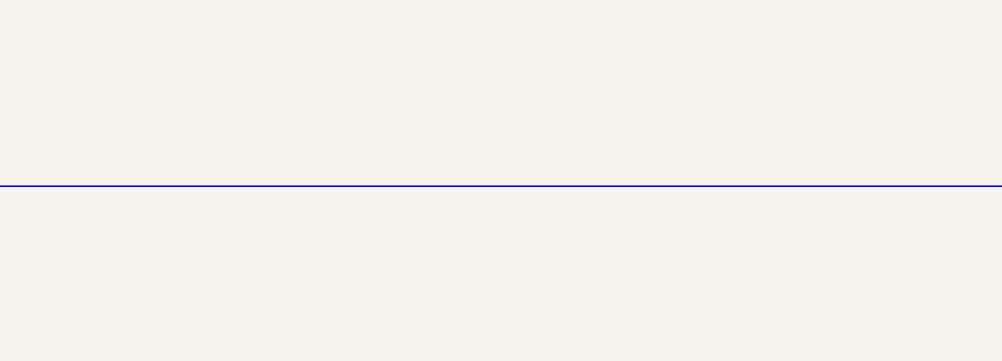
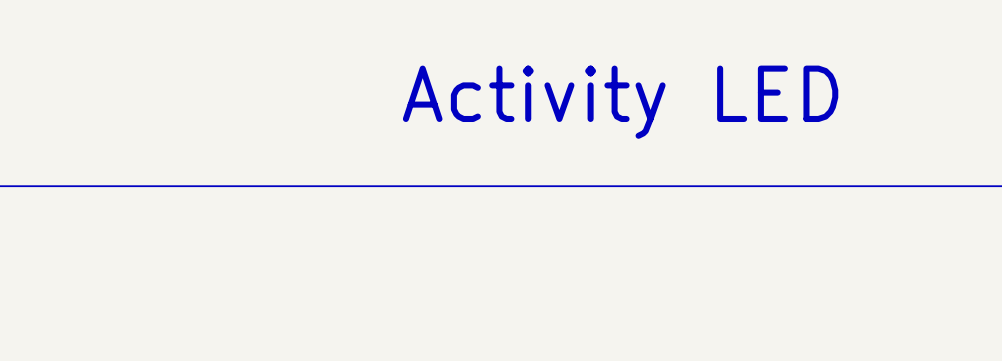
text: none -> Activity LED (620, 102)

